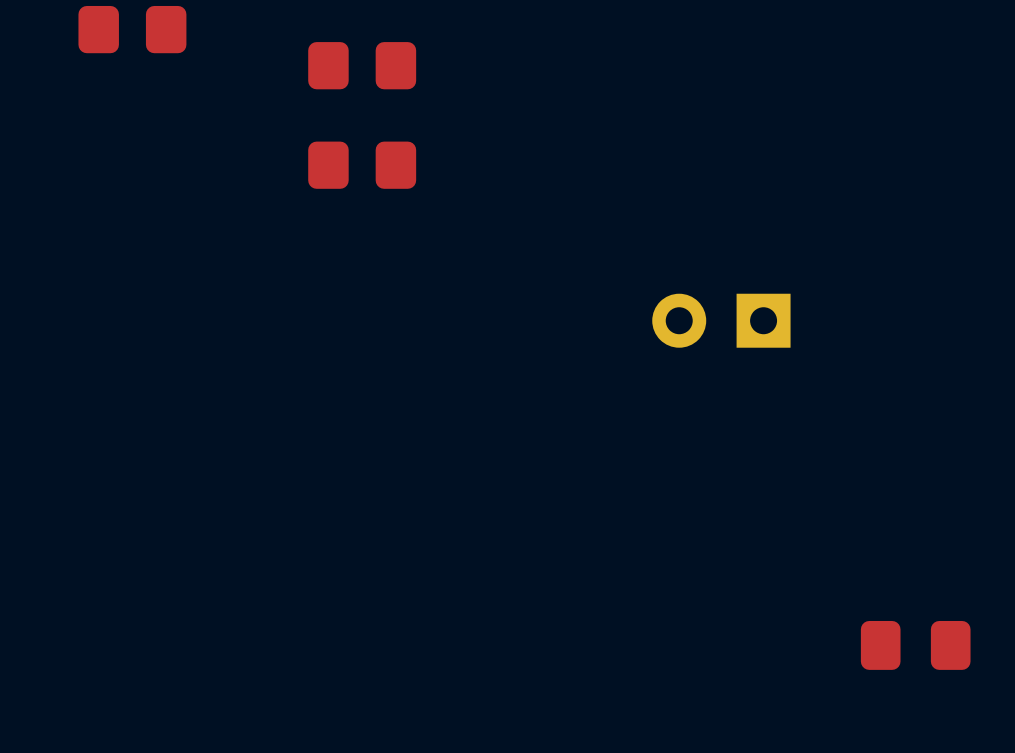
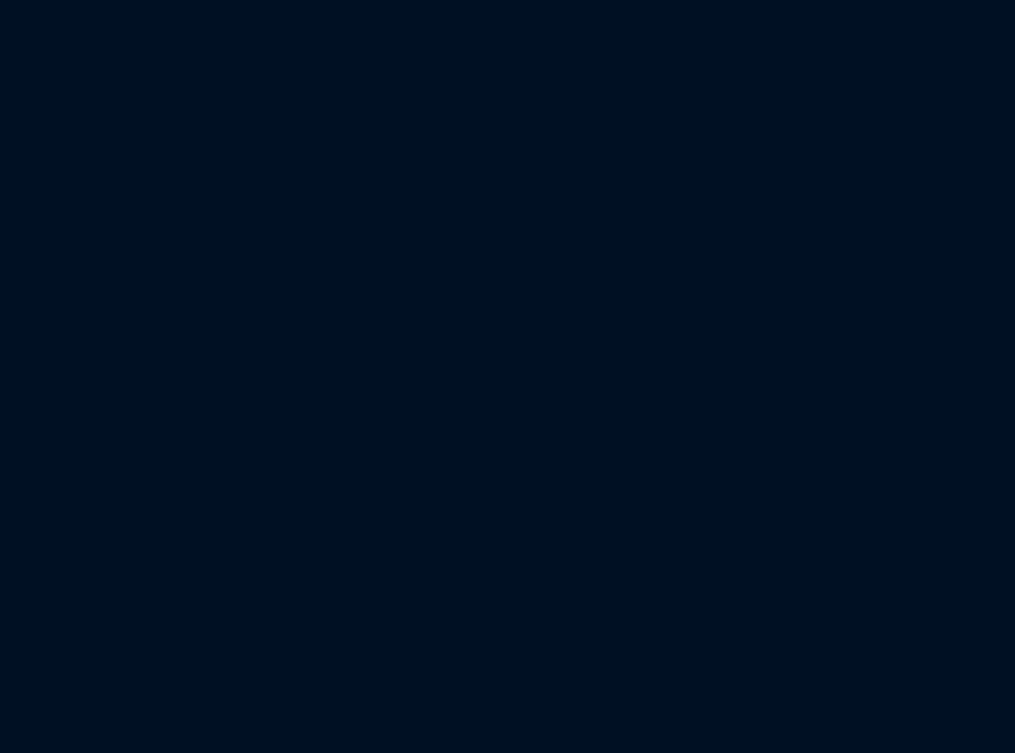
part: (132, 29) -> none
part: (362, 65) -> none
part: (362, 165) -> none
part: (721, 320) -> none
part: (915, 645) -> none

